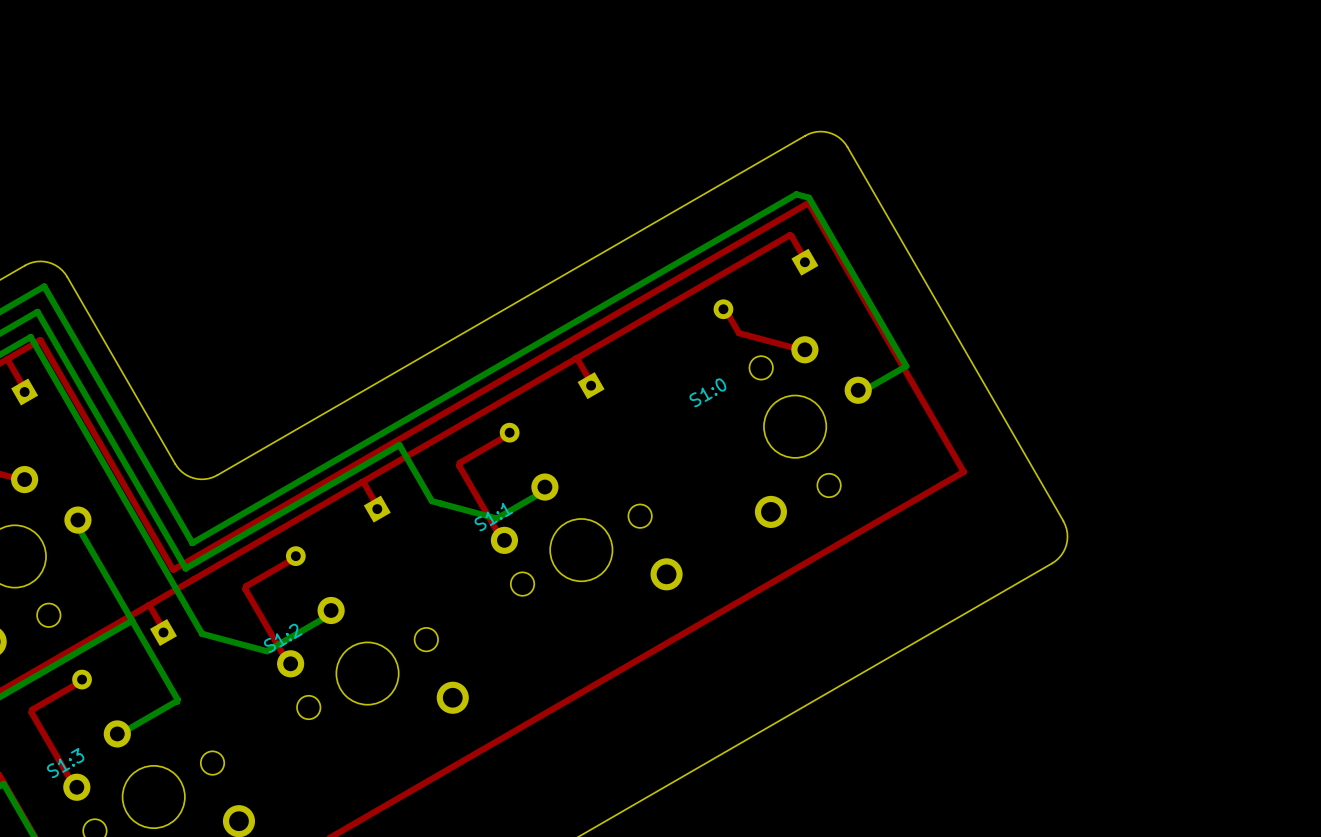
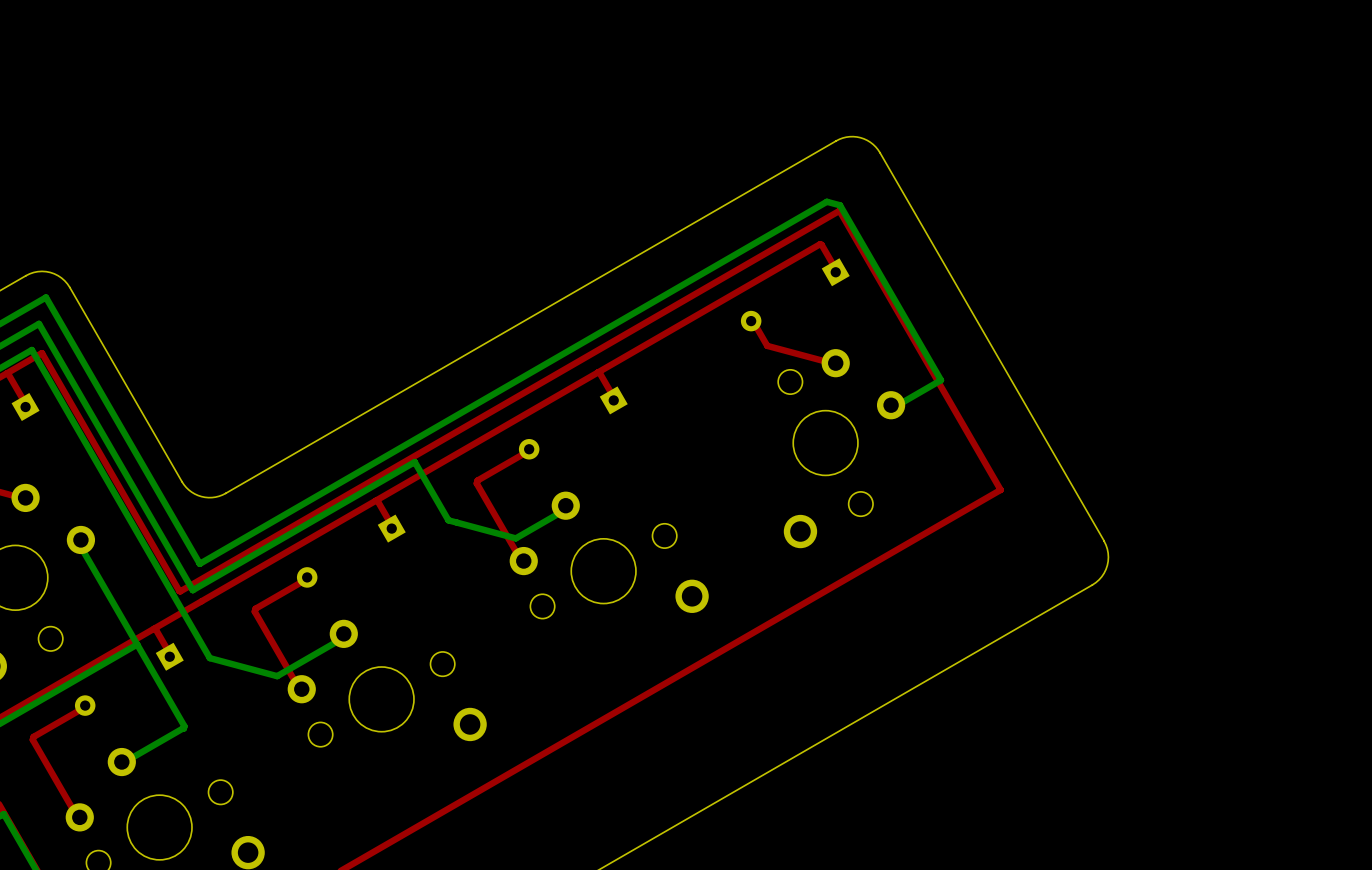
text: S1:0 (707, 392) -> none
text: S1:1 (493, 517) -> none
text: S1:2 (283, 638) -> none
text: S1:3 (65, 763) -> none

